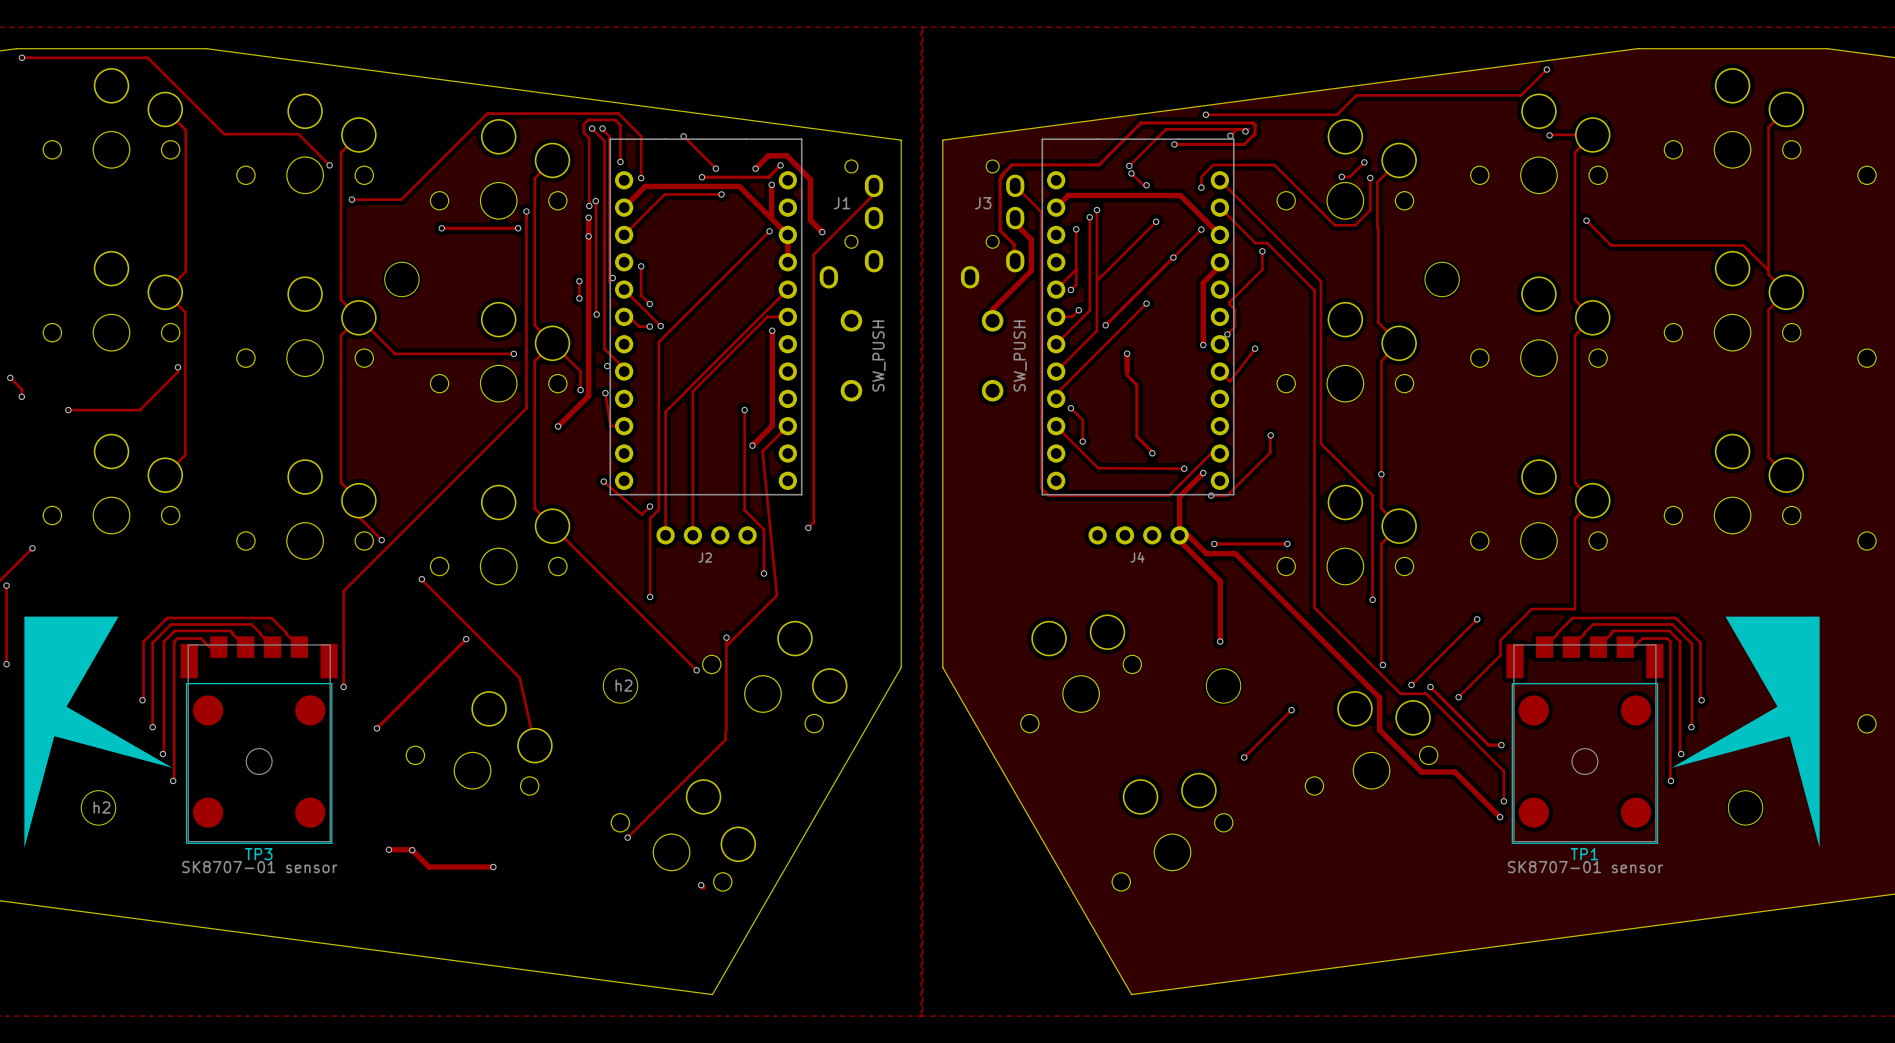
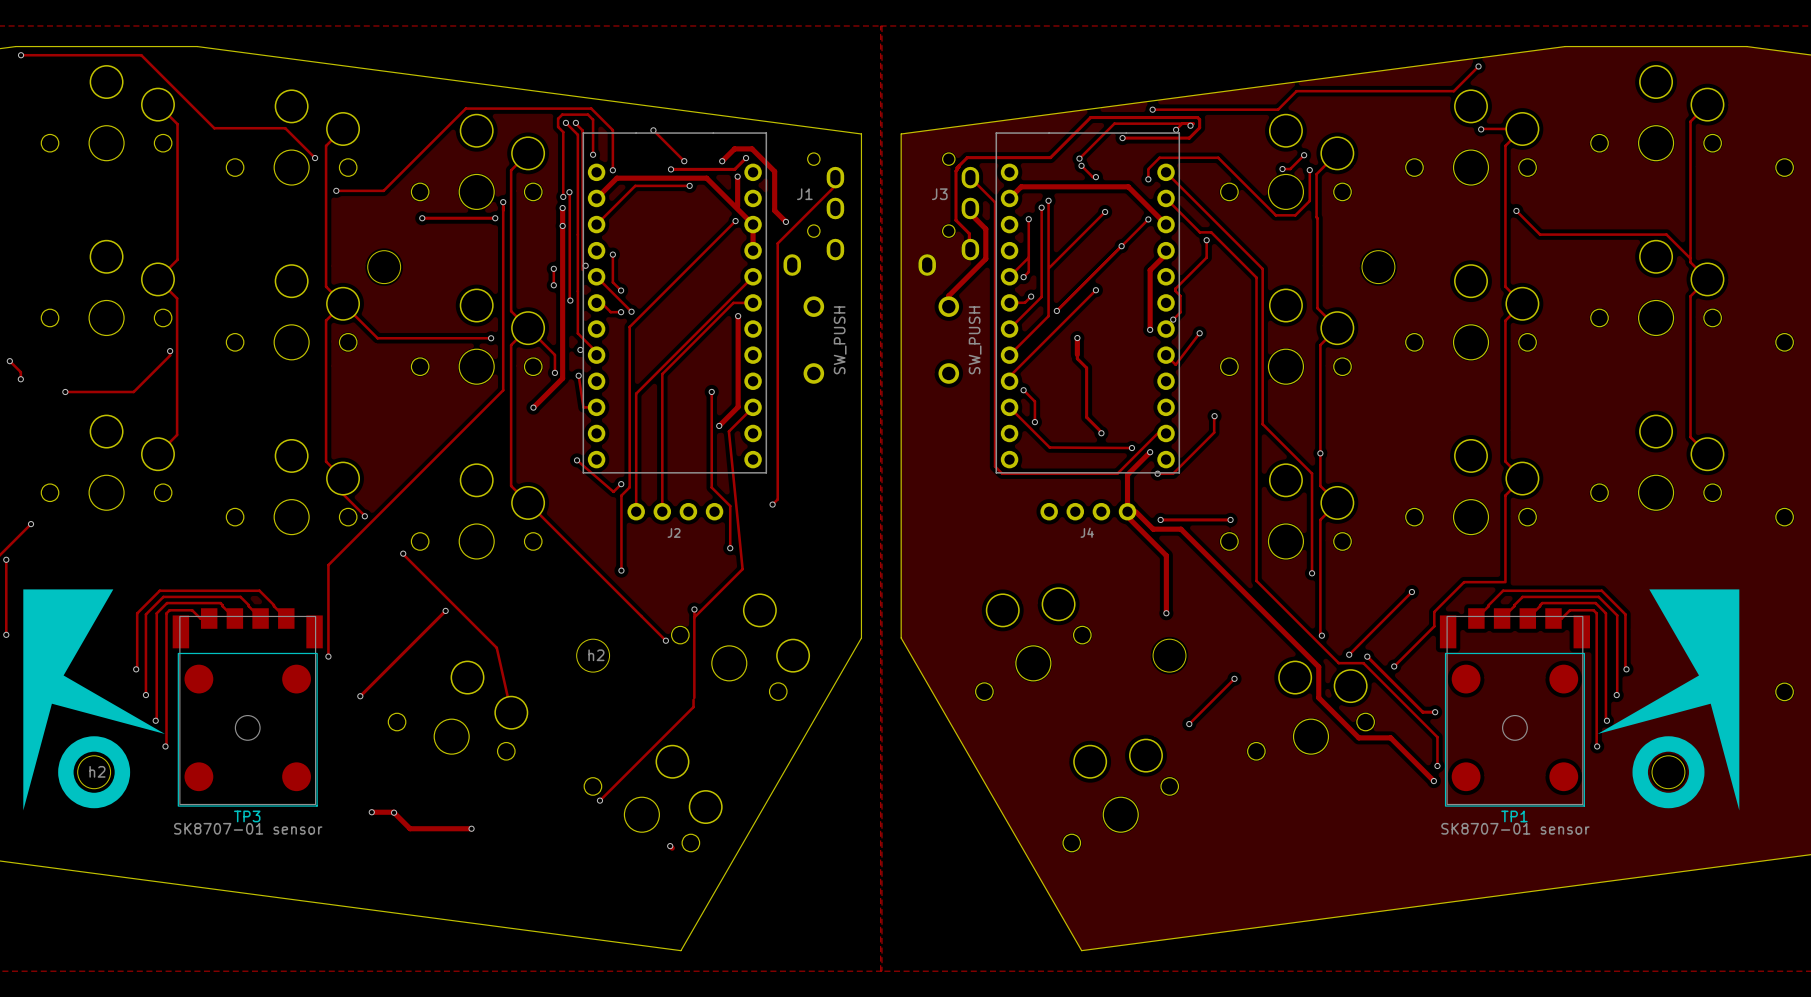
drawing: none -> [58, 736, 131, 809]
drawing: none -> [1632, 736, 1705, 809]

